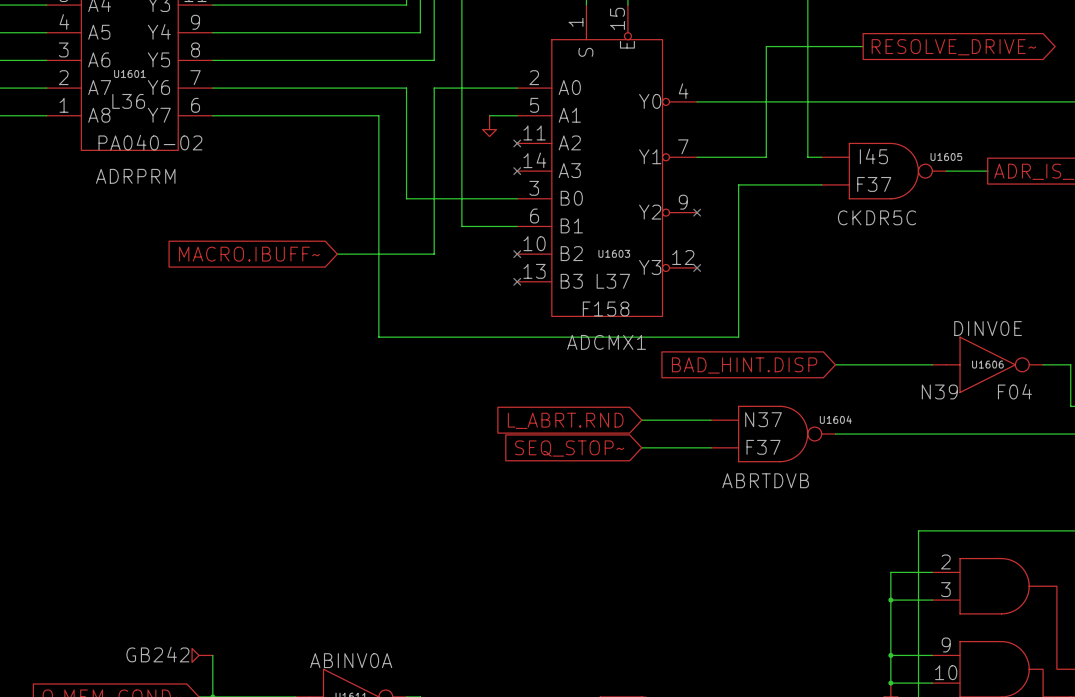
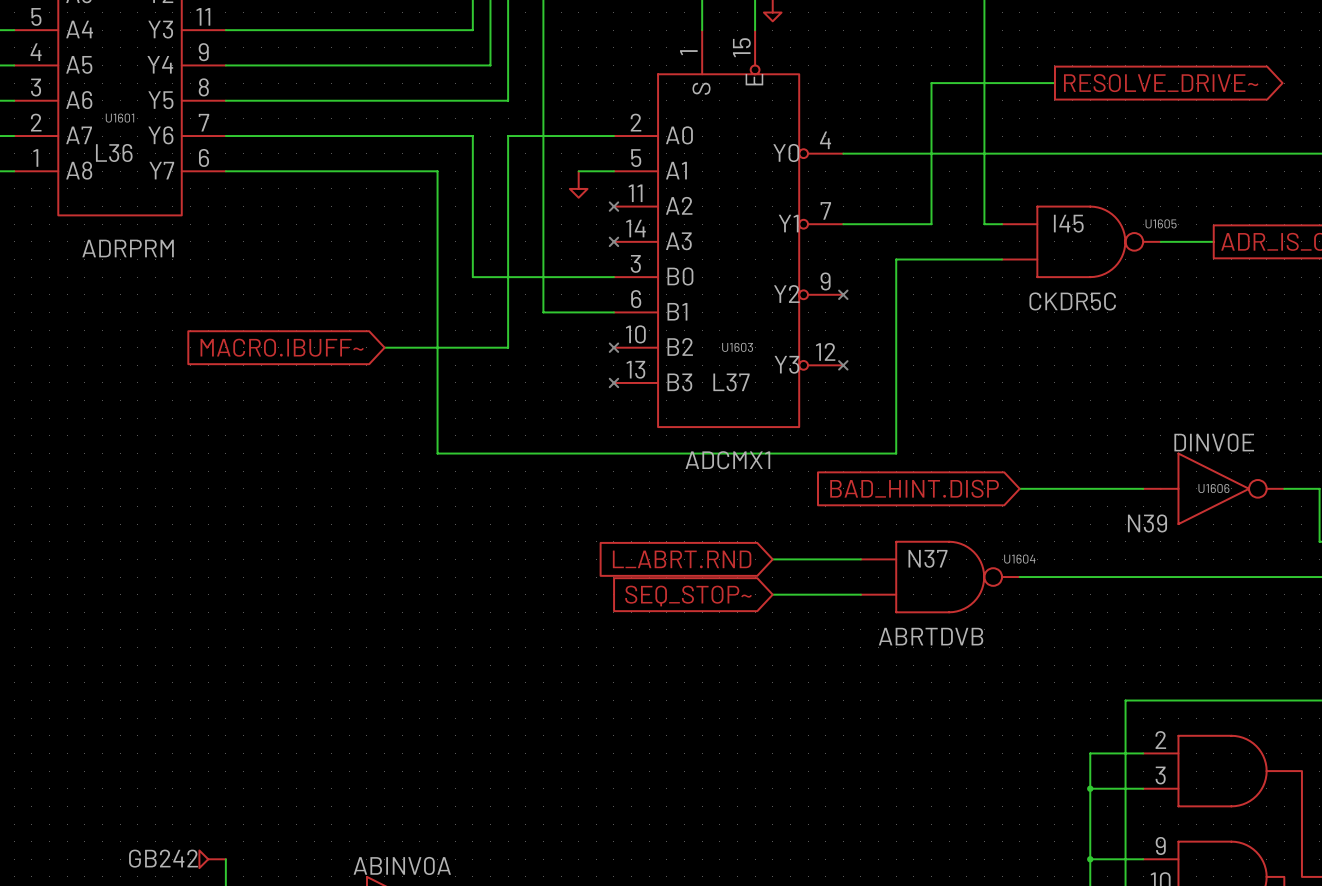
U1601 value: PA040-02 (150, 142) -> none
U1605 value: F37 (874, 184) -> none
U1603 value: F158 (606, 308) -> none
U1606 value: F04 (1014, 391) -> none
U1604 value: F37 (763, 447) -> none

